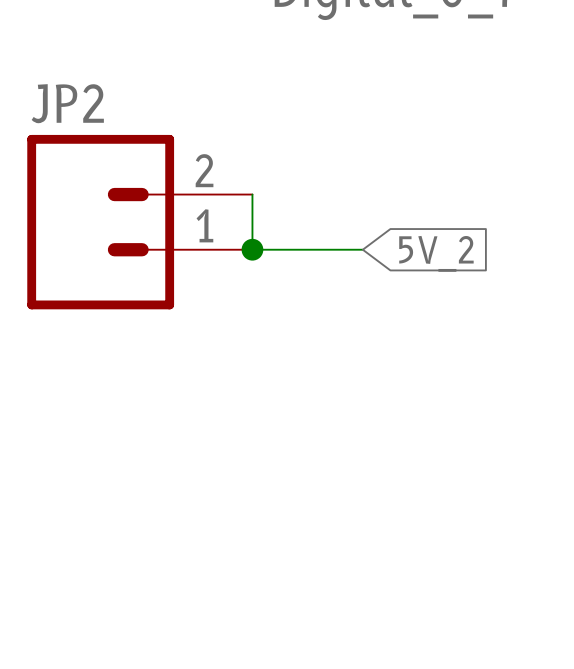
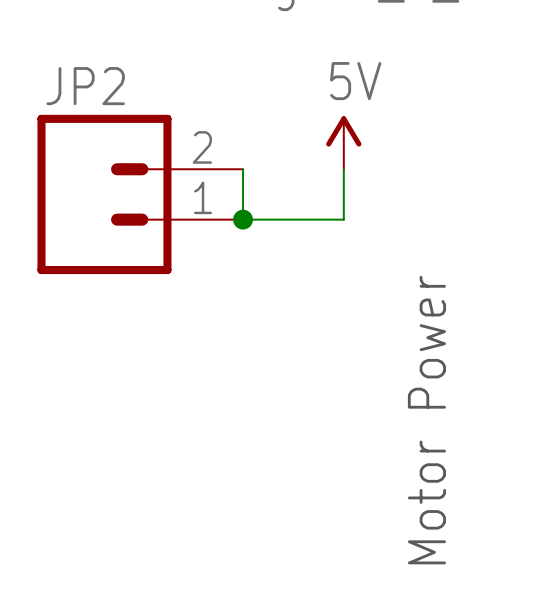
power symbol: none -> 5V (343, 142)
wire: none -> (343, 169) (343, 219)
global label: 5V_2 (436, 253) -> none
text: none -> Motor Power (426, 420)

